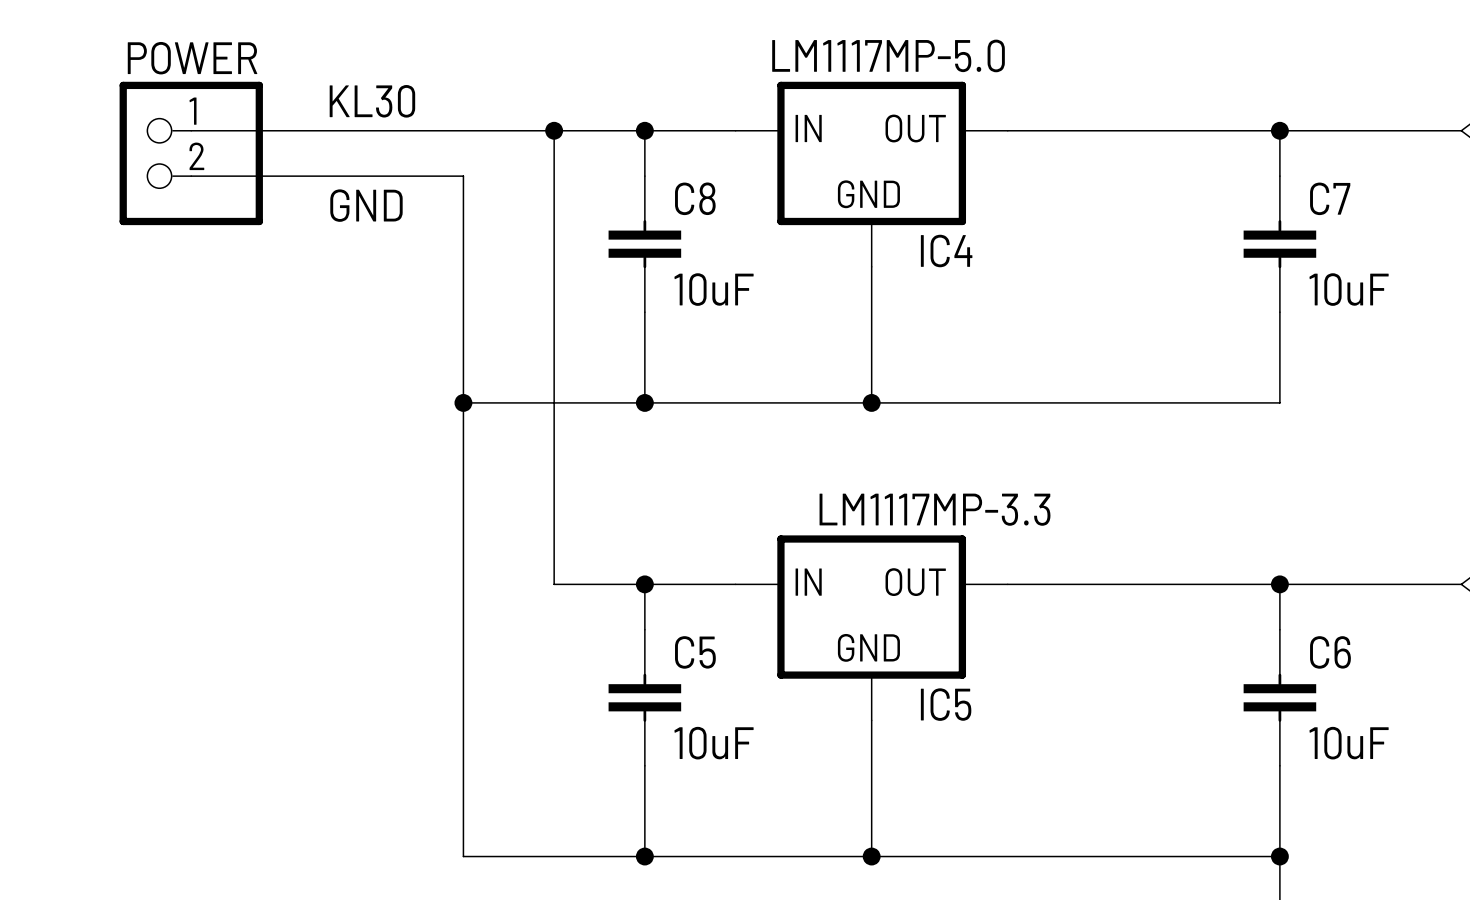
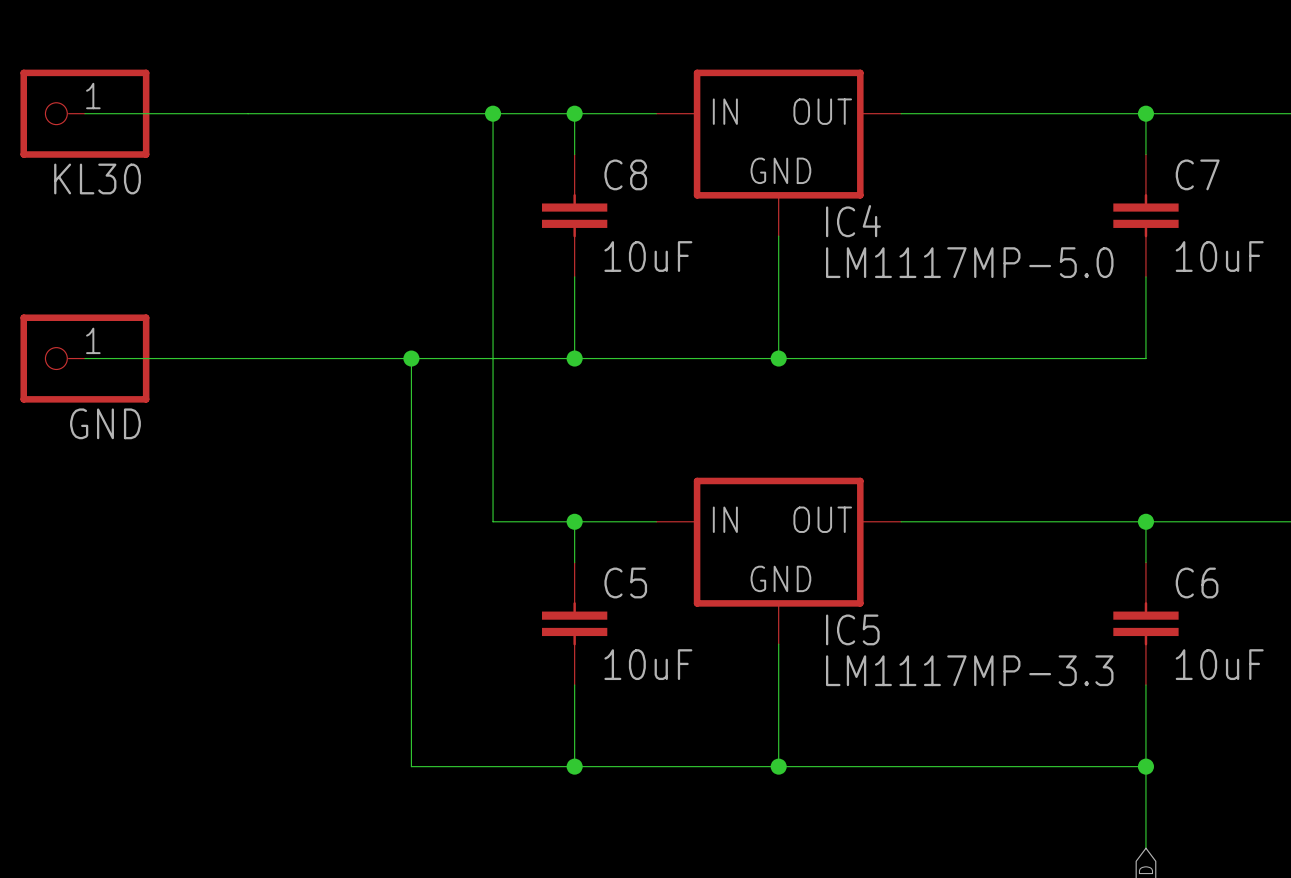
IC4 value position: LM1117MP-5.0 (888, 55) -> LM1117MP-5.0 (969, 262)
label: KL30 (372, 101) -> none
wire: none -> (84, 113) (166, 113)
KL30: none -> (84, 113)
POWER: (191, 153) -> none
wire: (191, 176) (463, 176) (463, 402) -> (84, 358) (411, 358)
label: GND (366, 205) -> none
GND: none -> (84, 358)
IC5 value position: LM1117MP-3.3 (935, 509) -> LM1117MP-3.3 (969, 670)

